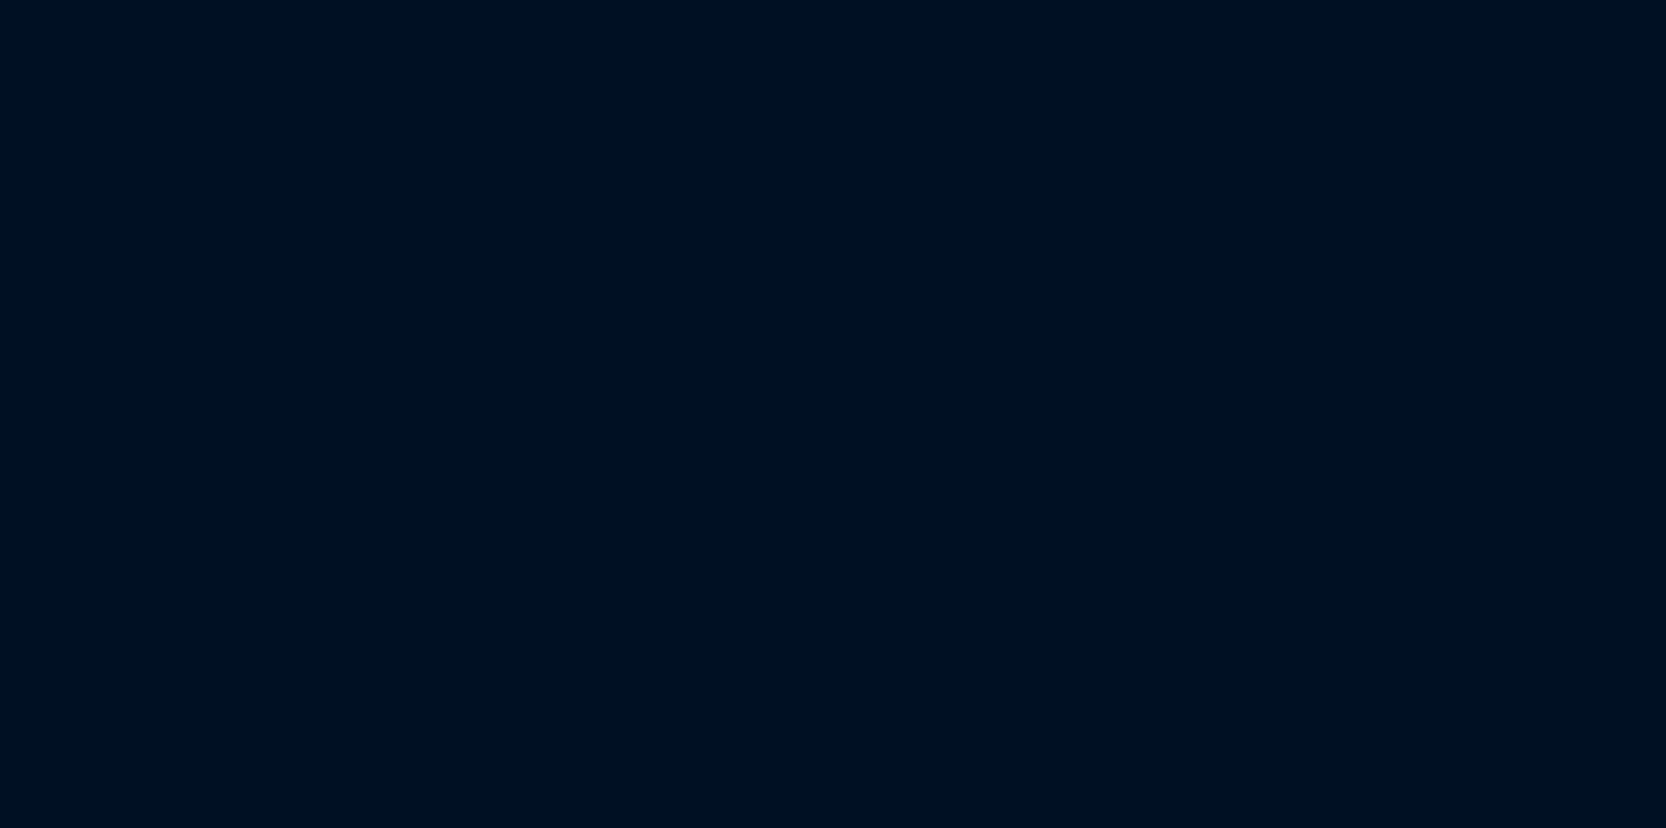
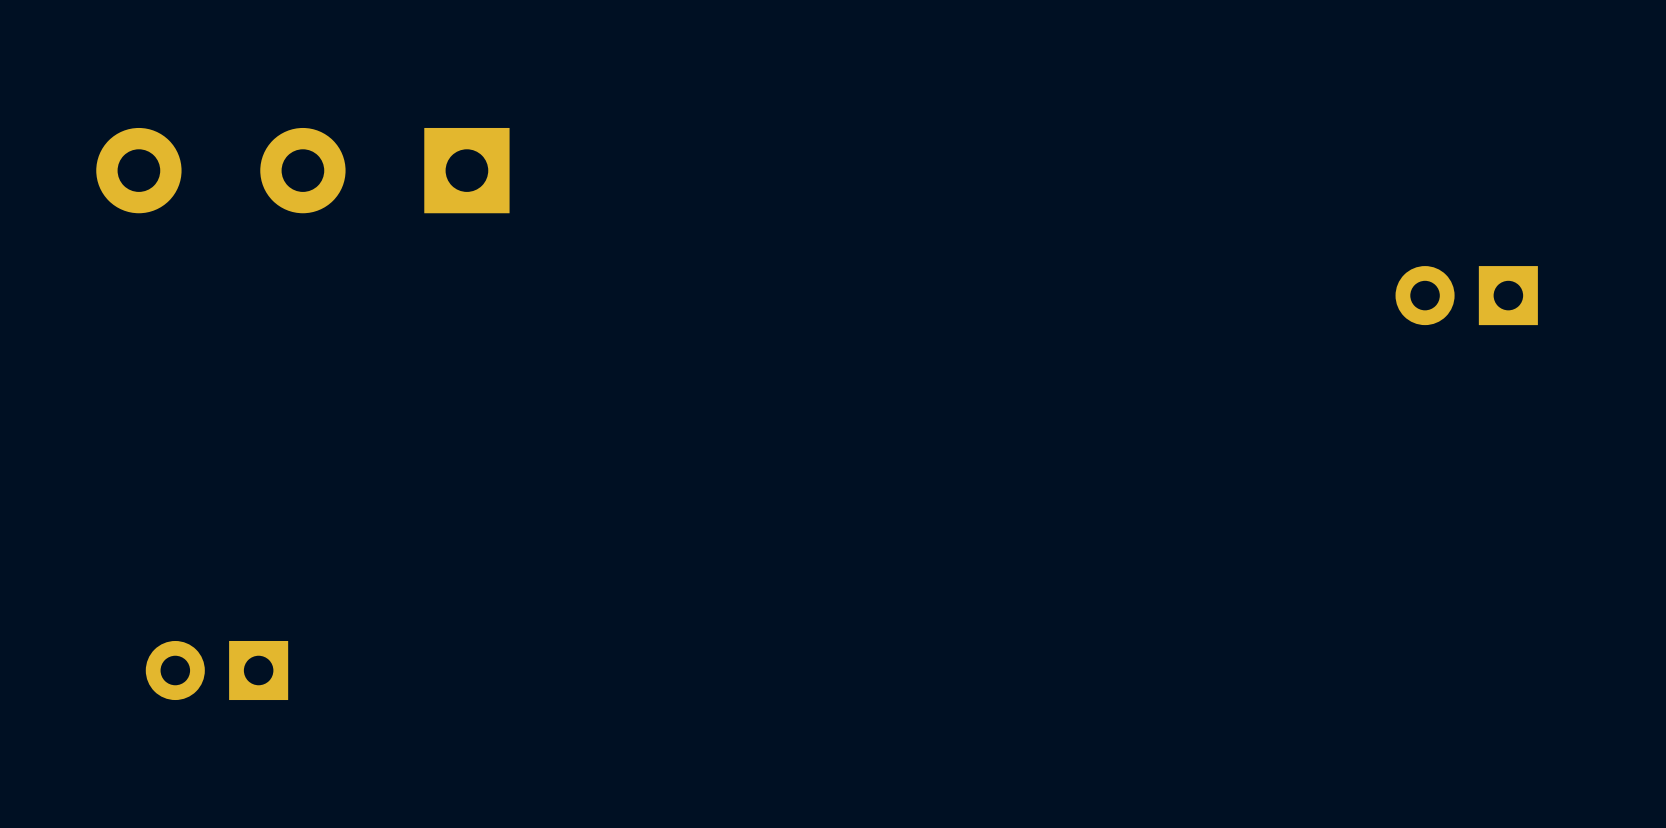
part: none -> (302, 170)
part: none -> (1466, 295)
part: none -> (216, 670)

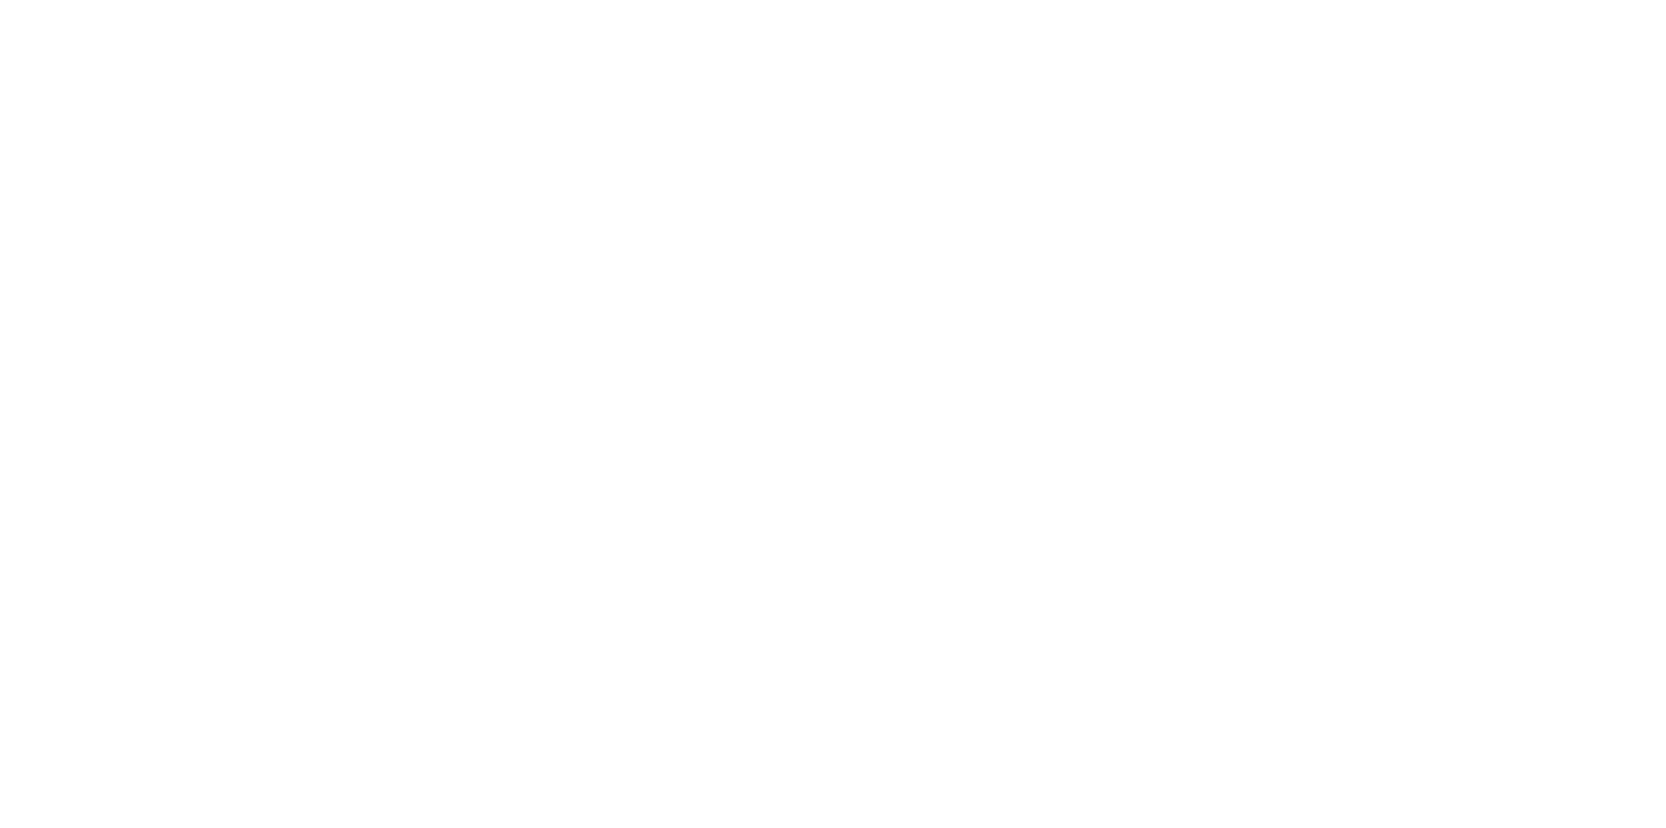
part: (302, 170) -> none
part: (1466, 295) -> none
part: (216, 670) -> none

